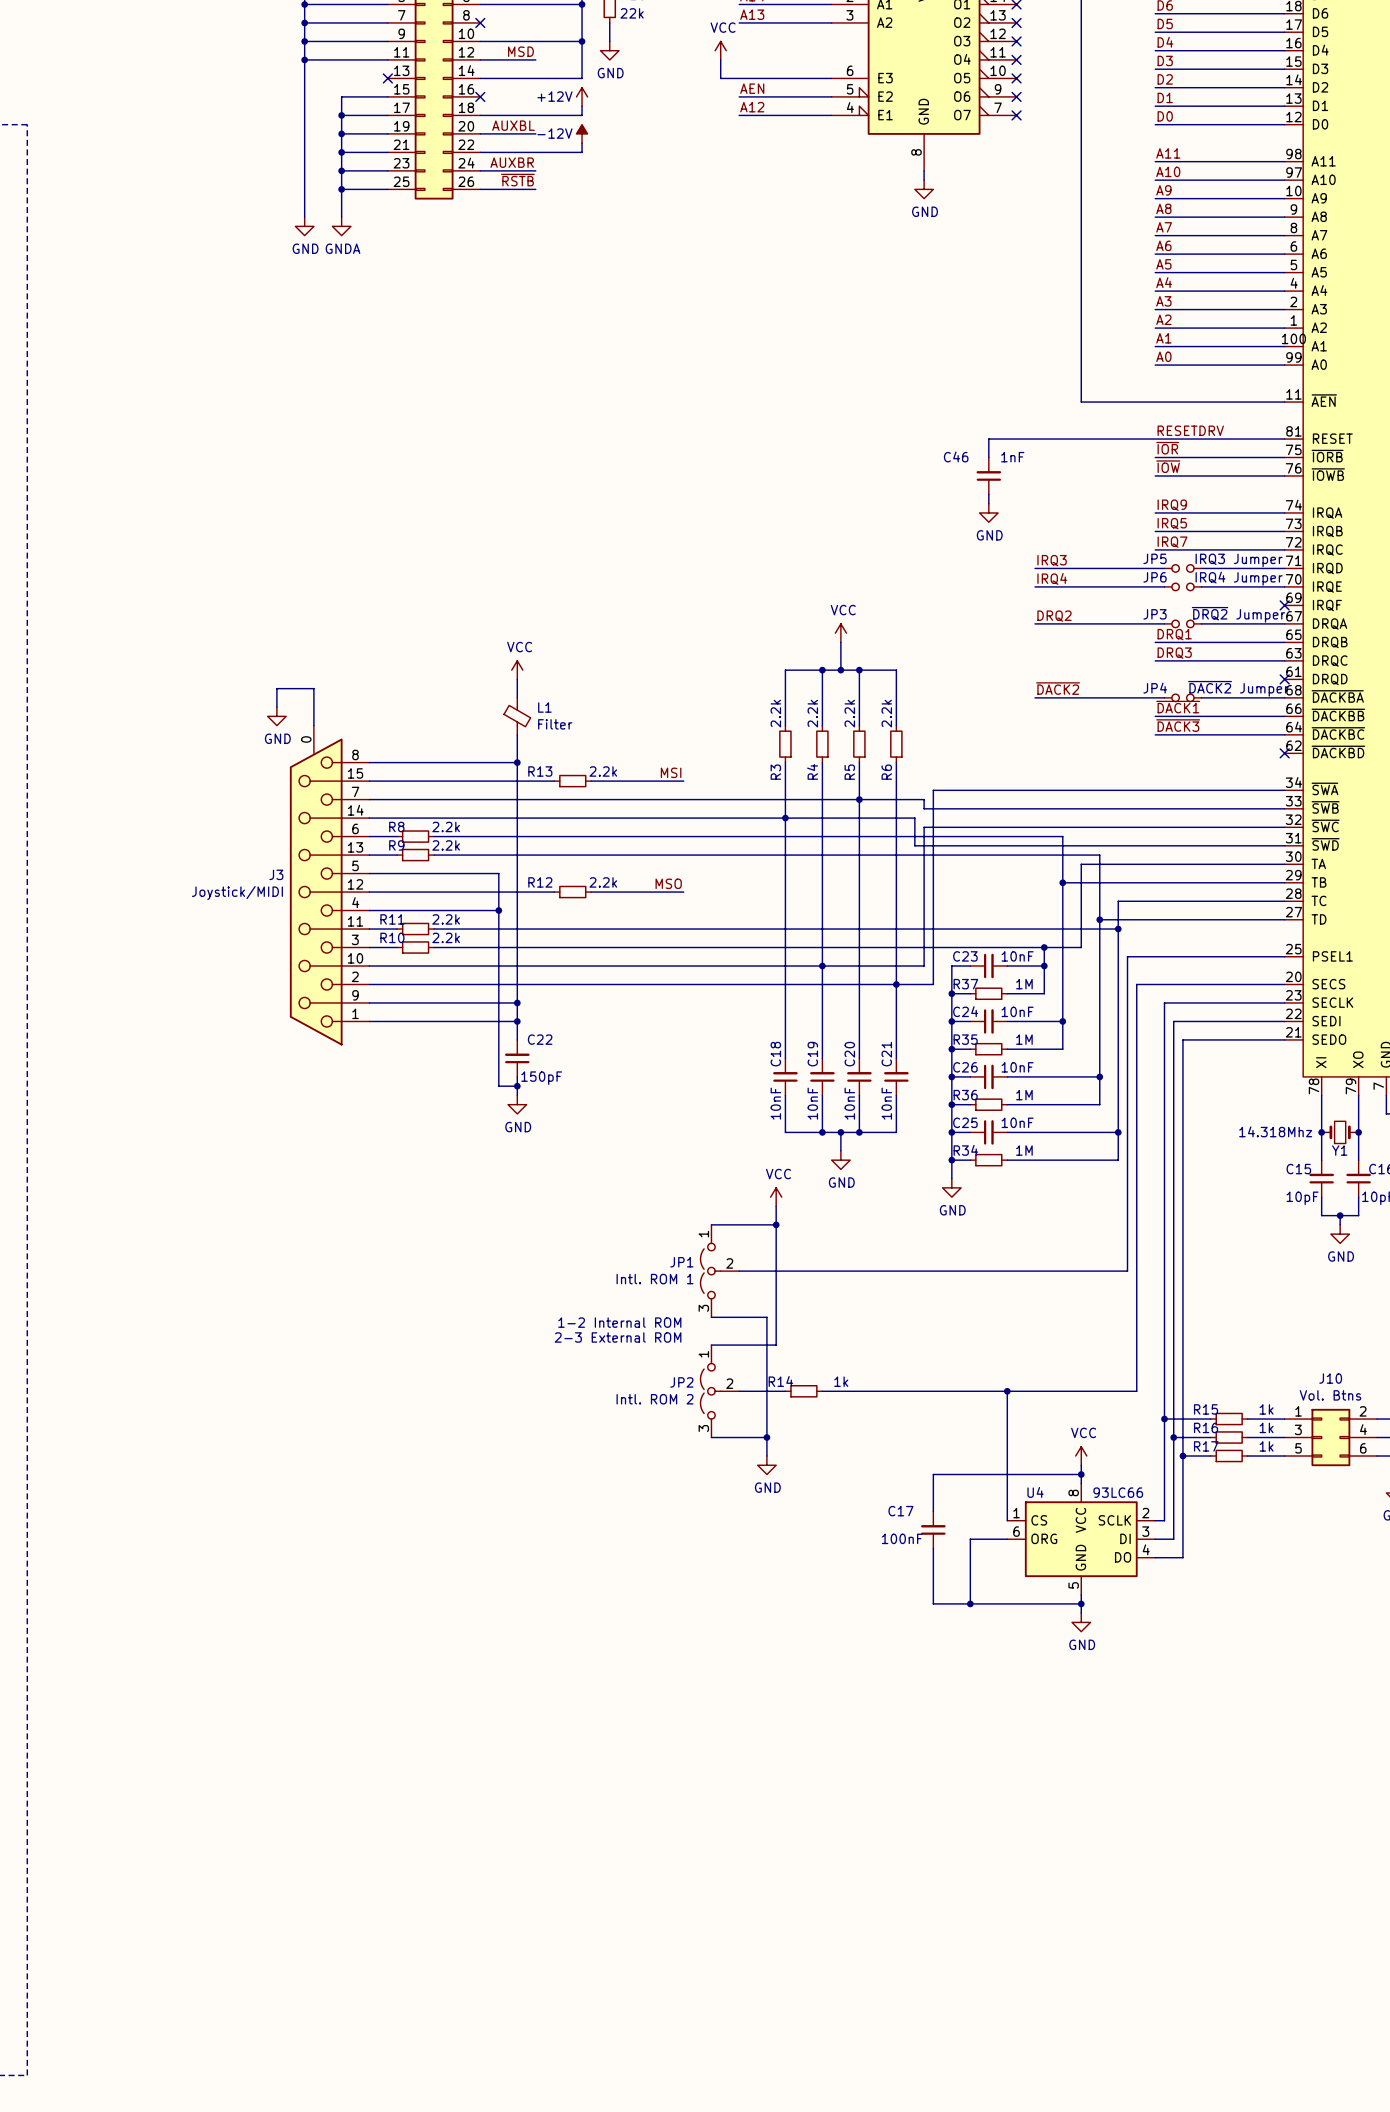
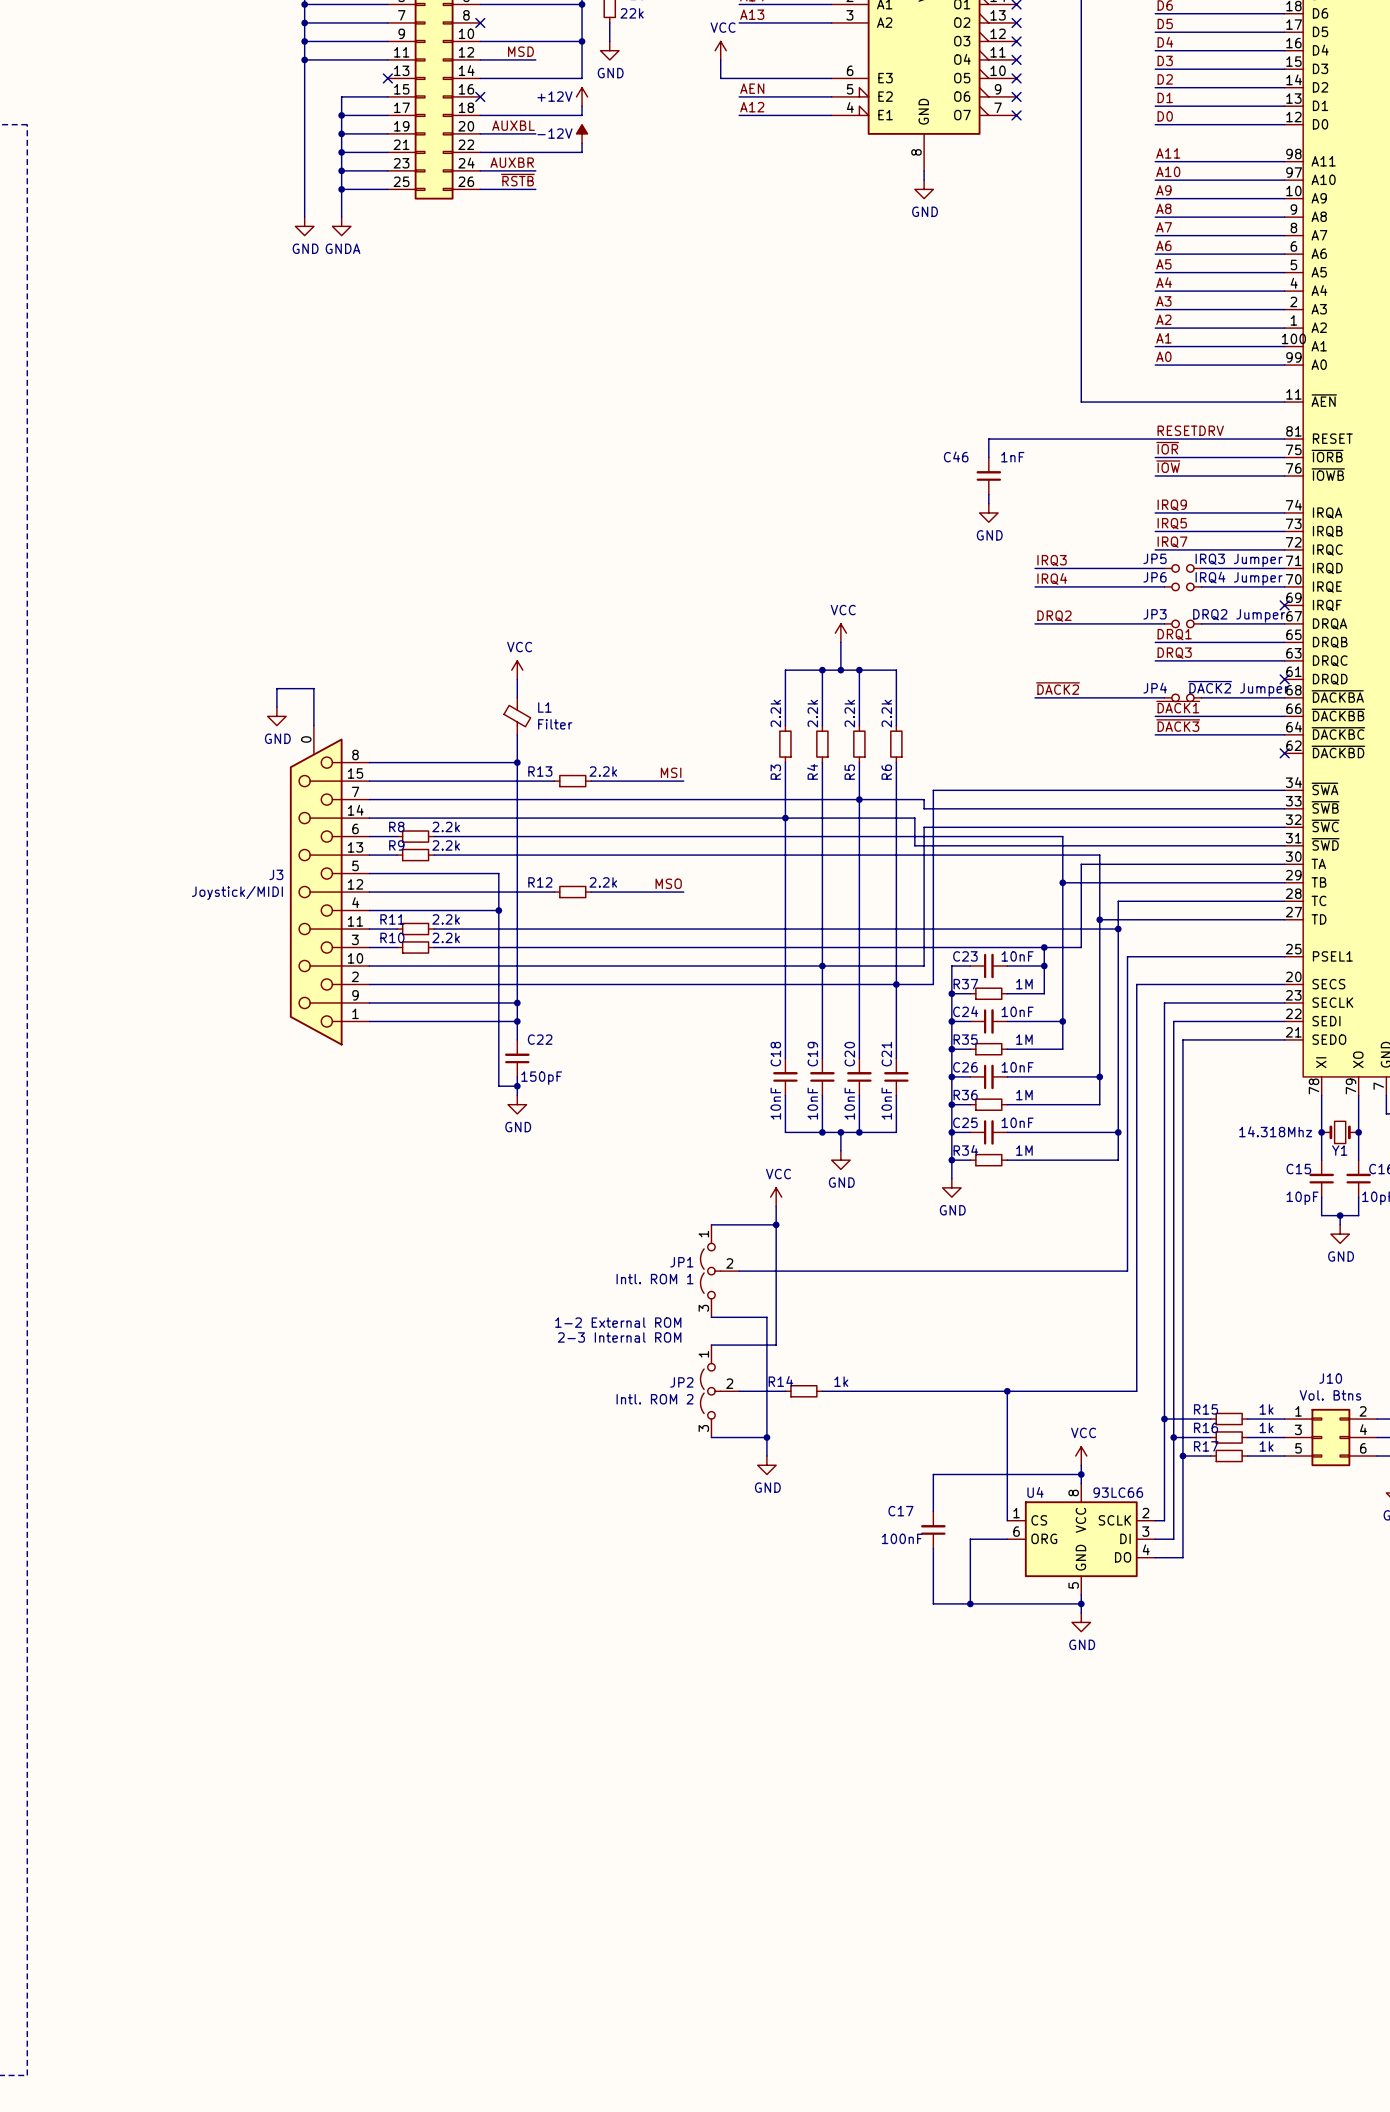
JP3 value: ~{DRQ2} Jumper (1238, 614) -> DRQ2 Jumper (1239, 615)
text: 1-2 Internal ROM (619, 1322) -> 1-2 External ROM (618, 1322)
text: 2-3 External ROM (618, 1337) -> 2-3 Internal ROM (619, 1337)

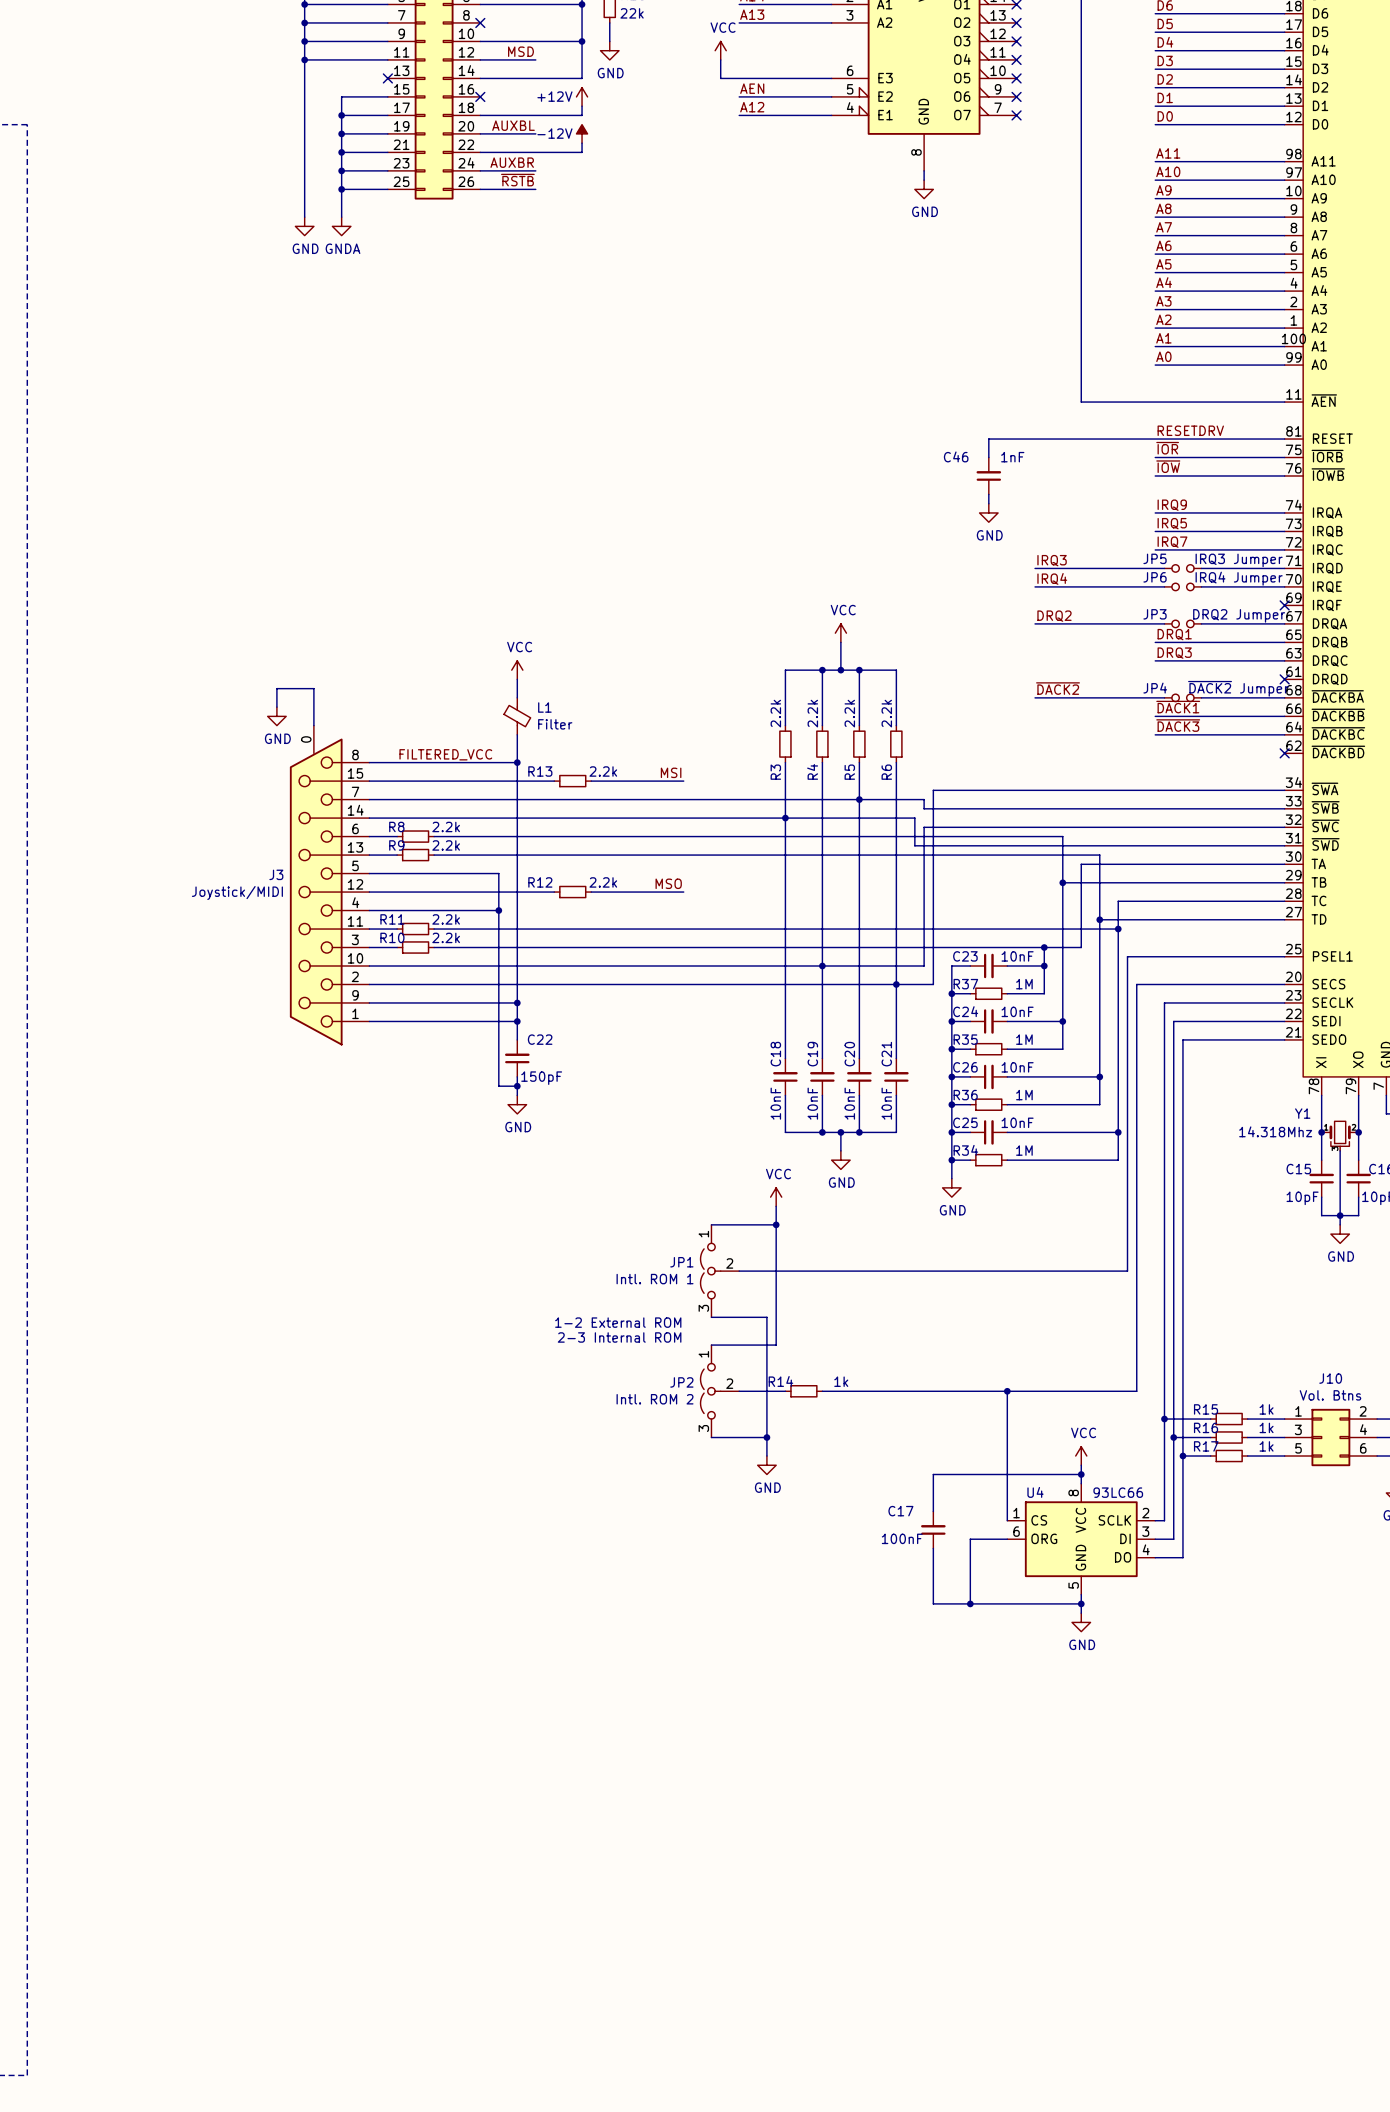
label: none -> FILTERED_VCC (445, 754)
Y1 symbol: [1321, 1121, 1359, 1144] -> [1321, 1121, 1359, 1151]
Y1 name position: Y1 (1339, 1150) -> Y1 (1302, 1113)
wire: none -> (1340, 1150) (1340, 1215)

